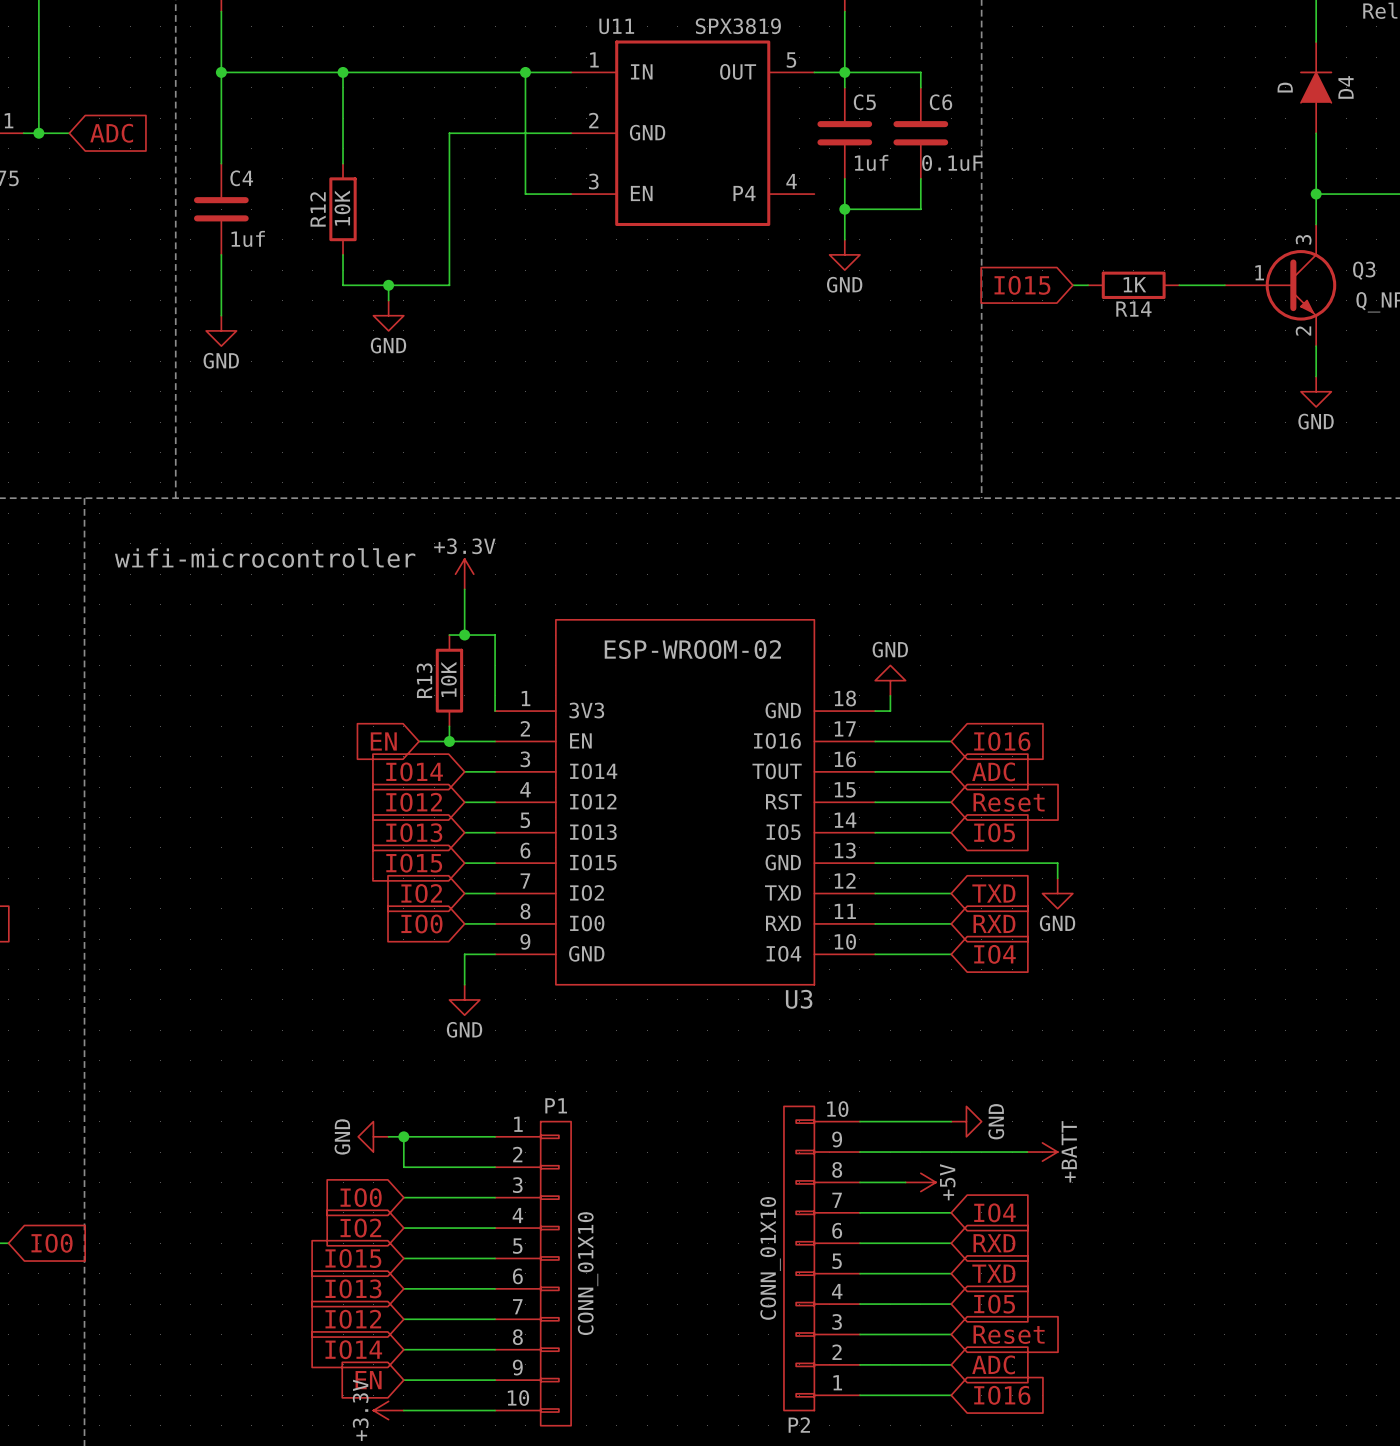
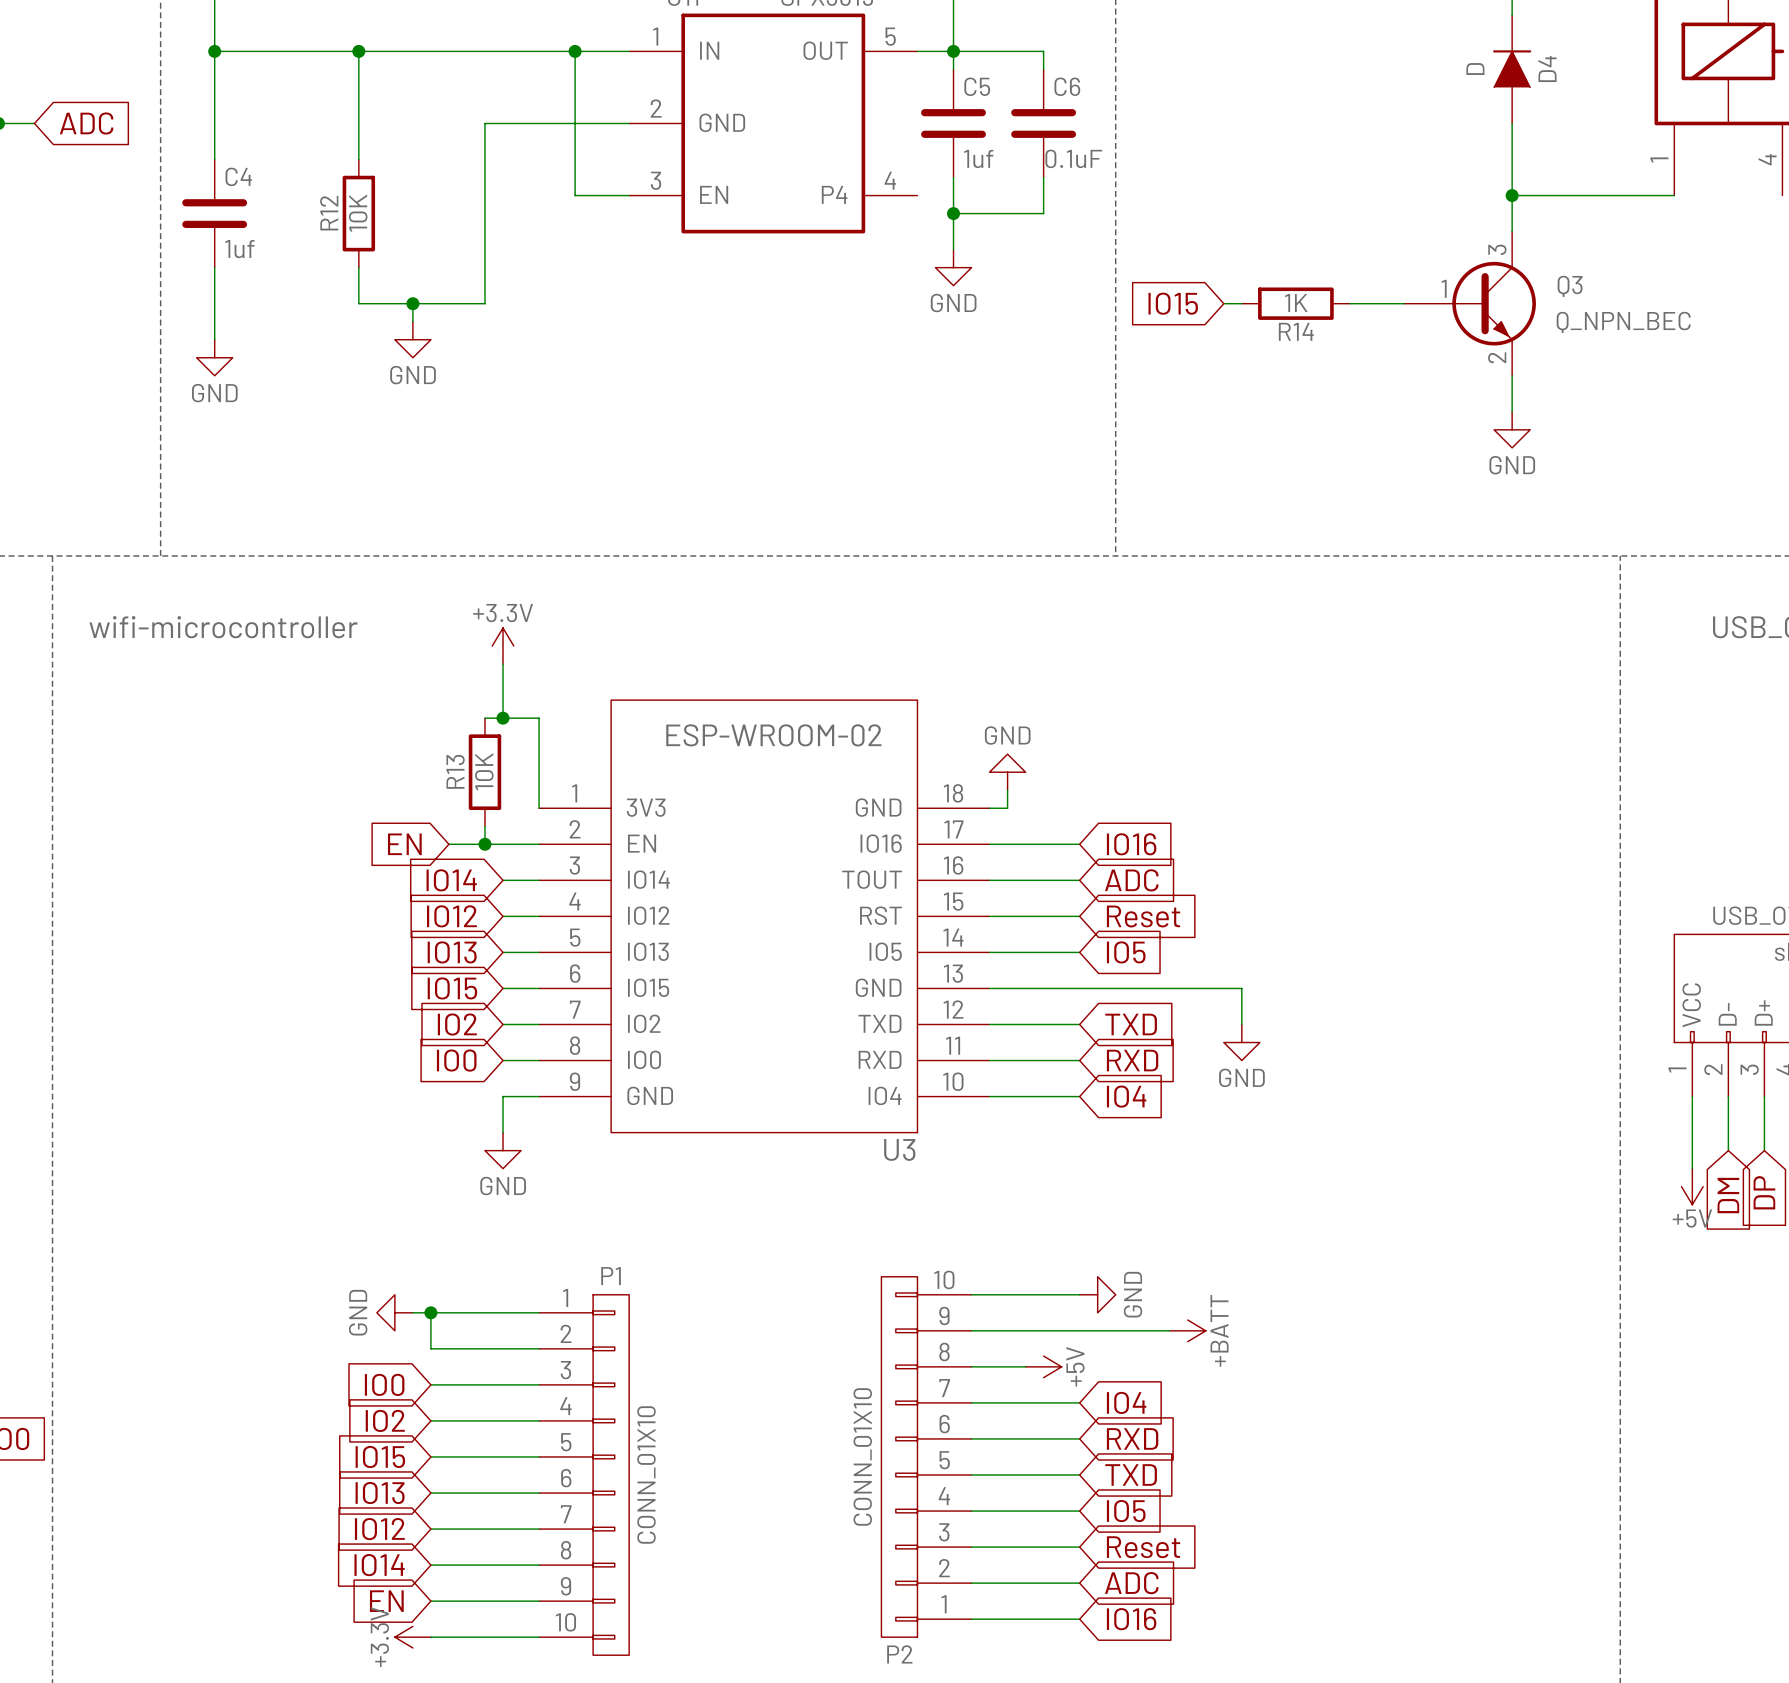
wire: (1057, 863) (1057, 878) -> (1205, 988) (1241, 988) (1241, 1024)
power symbol position: GND (1057, 893) -> GND (1241, 1042)

